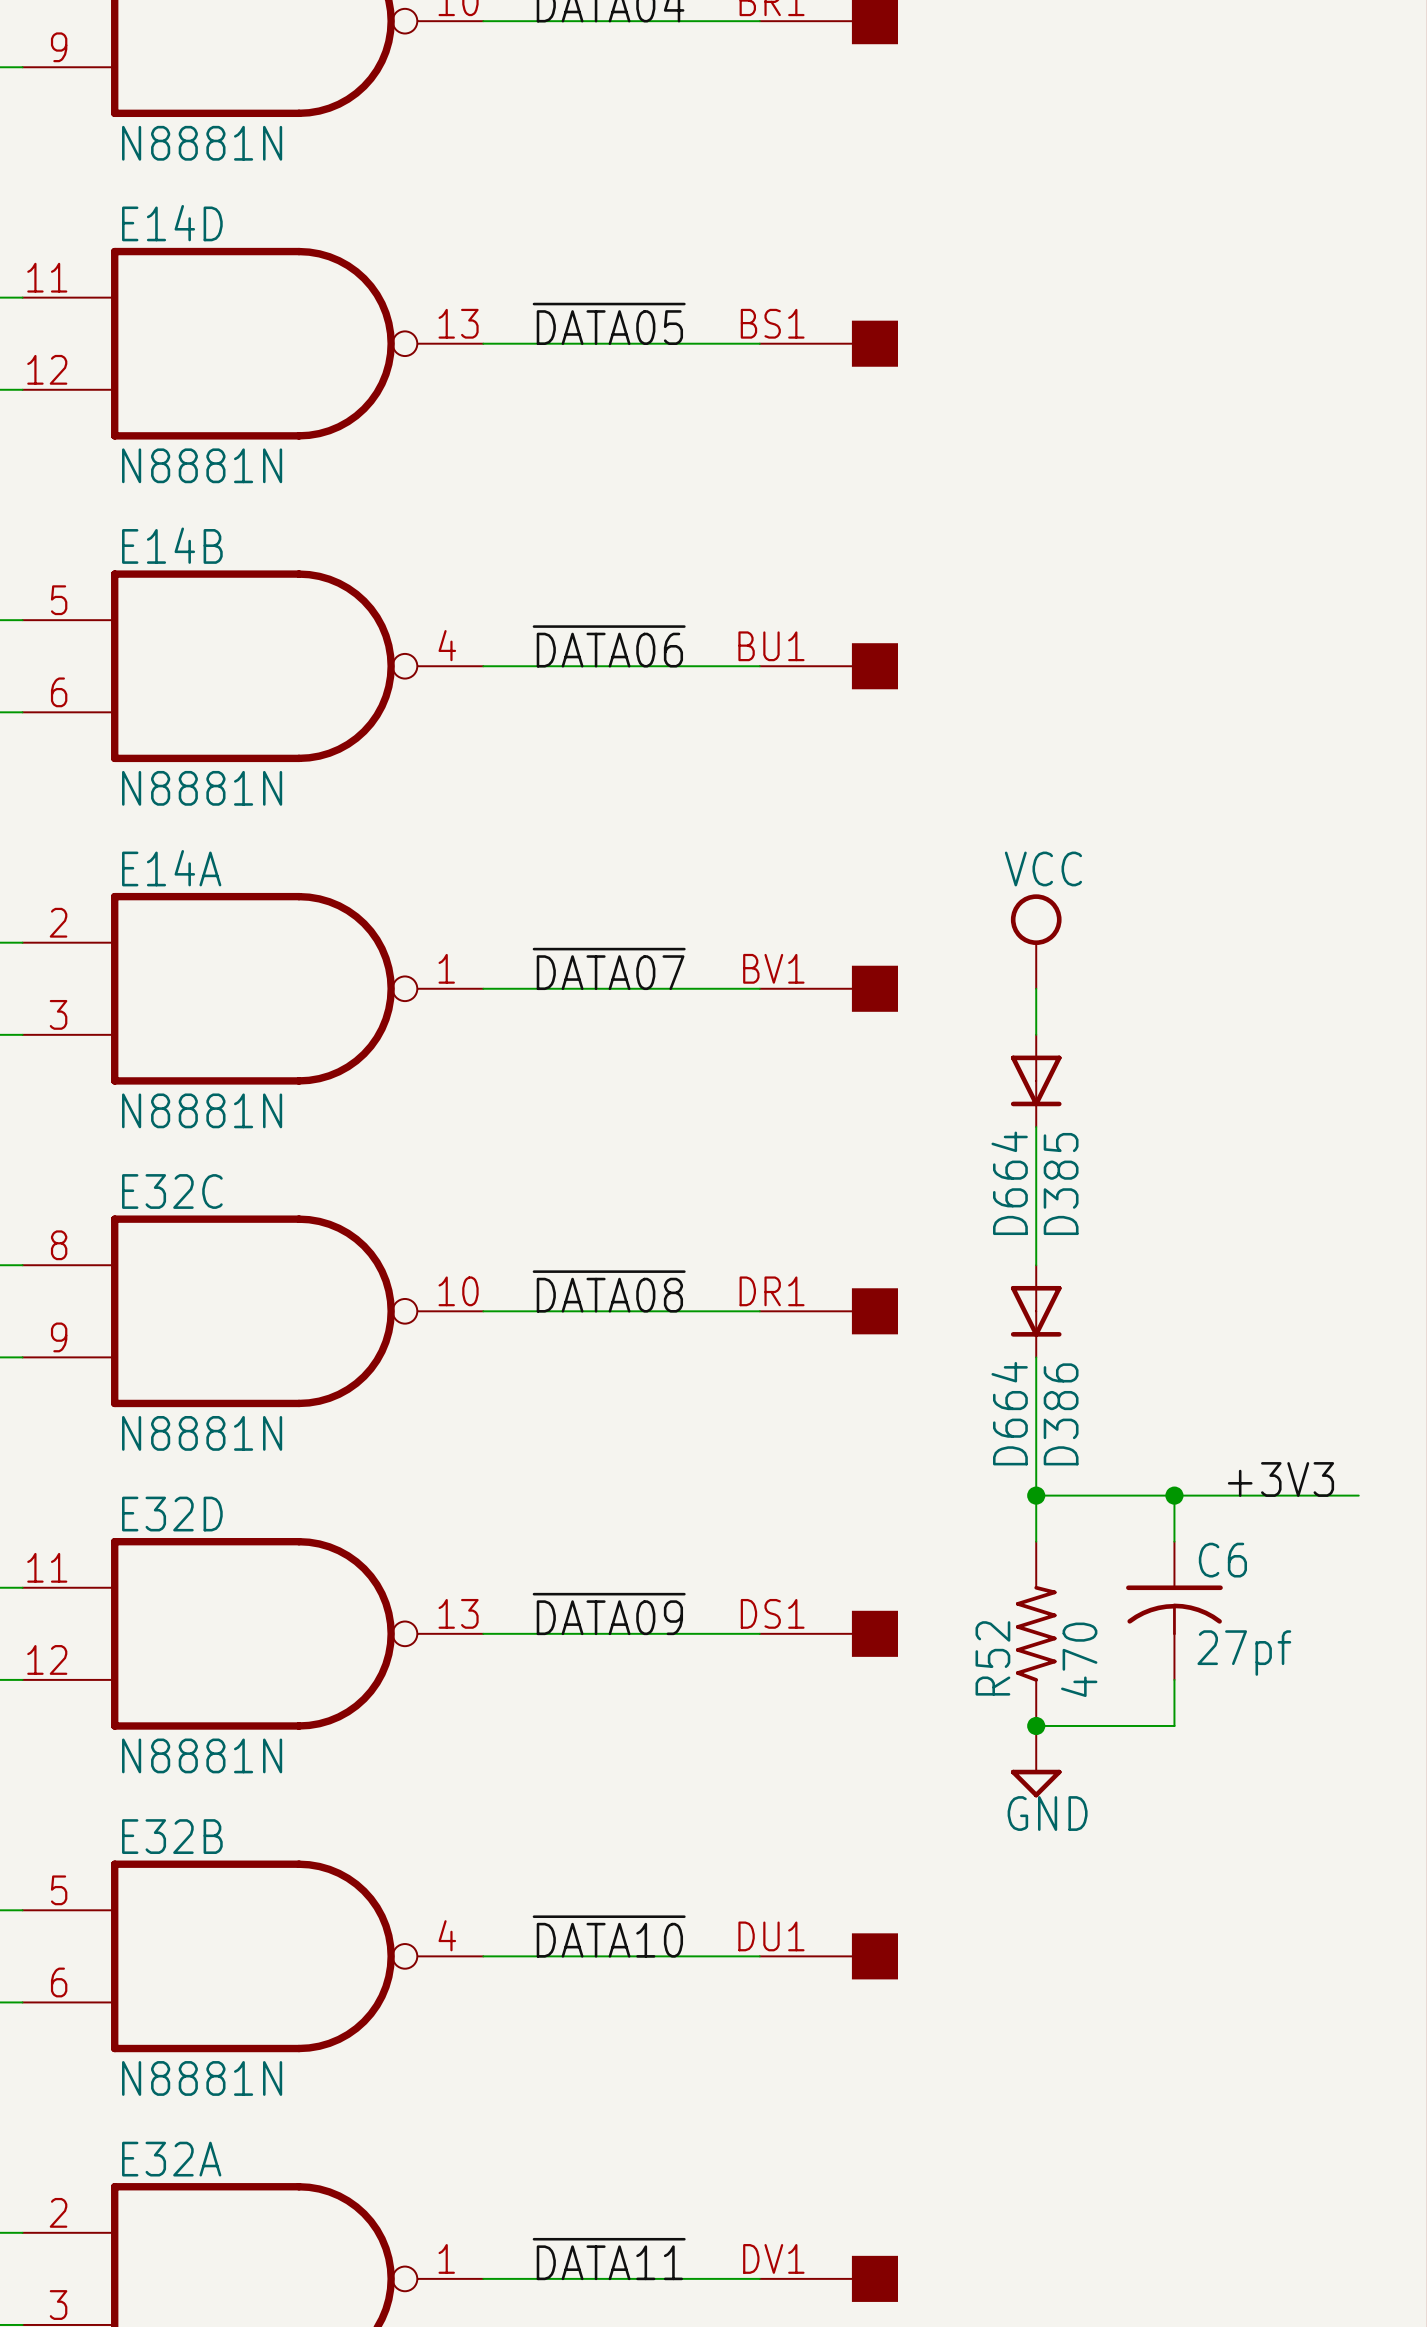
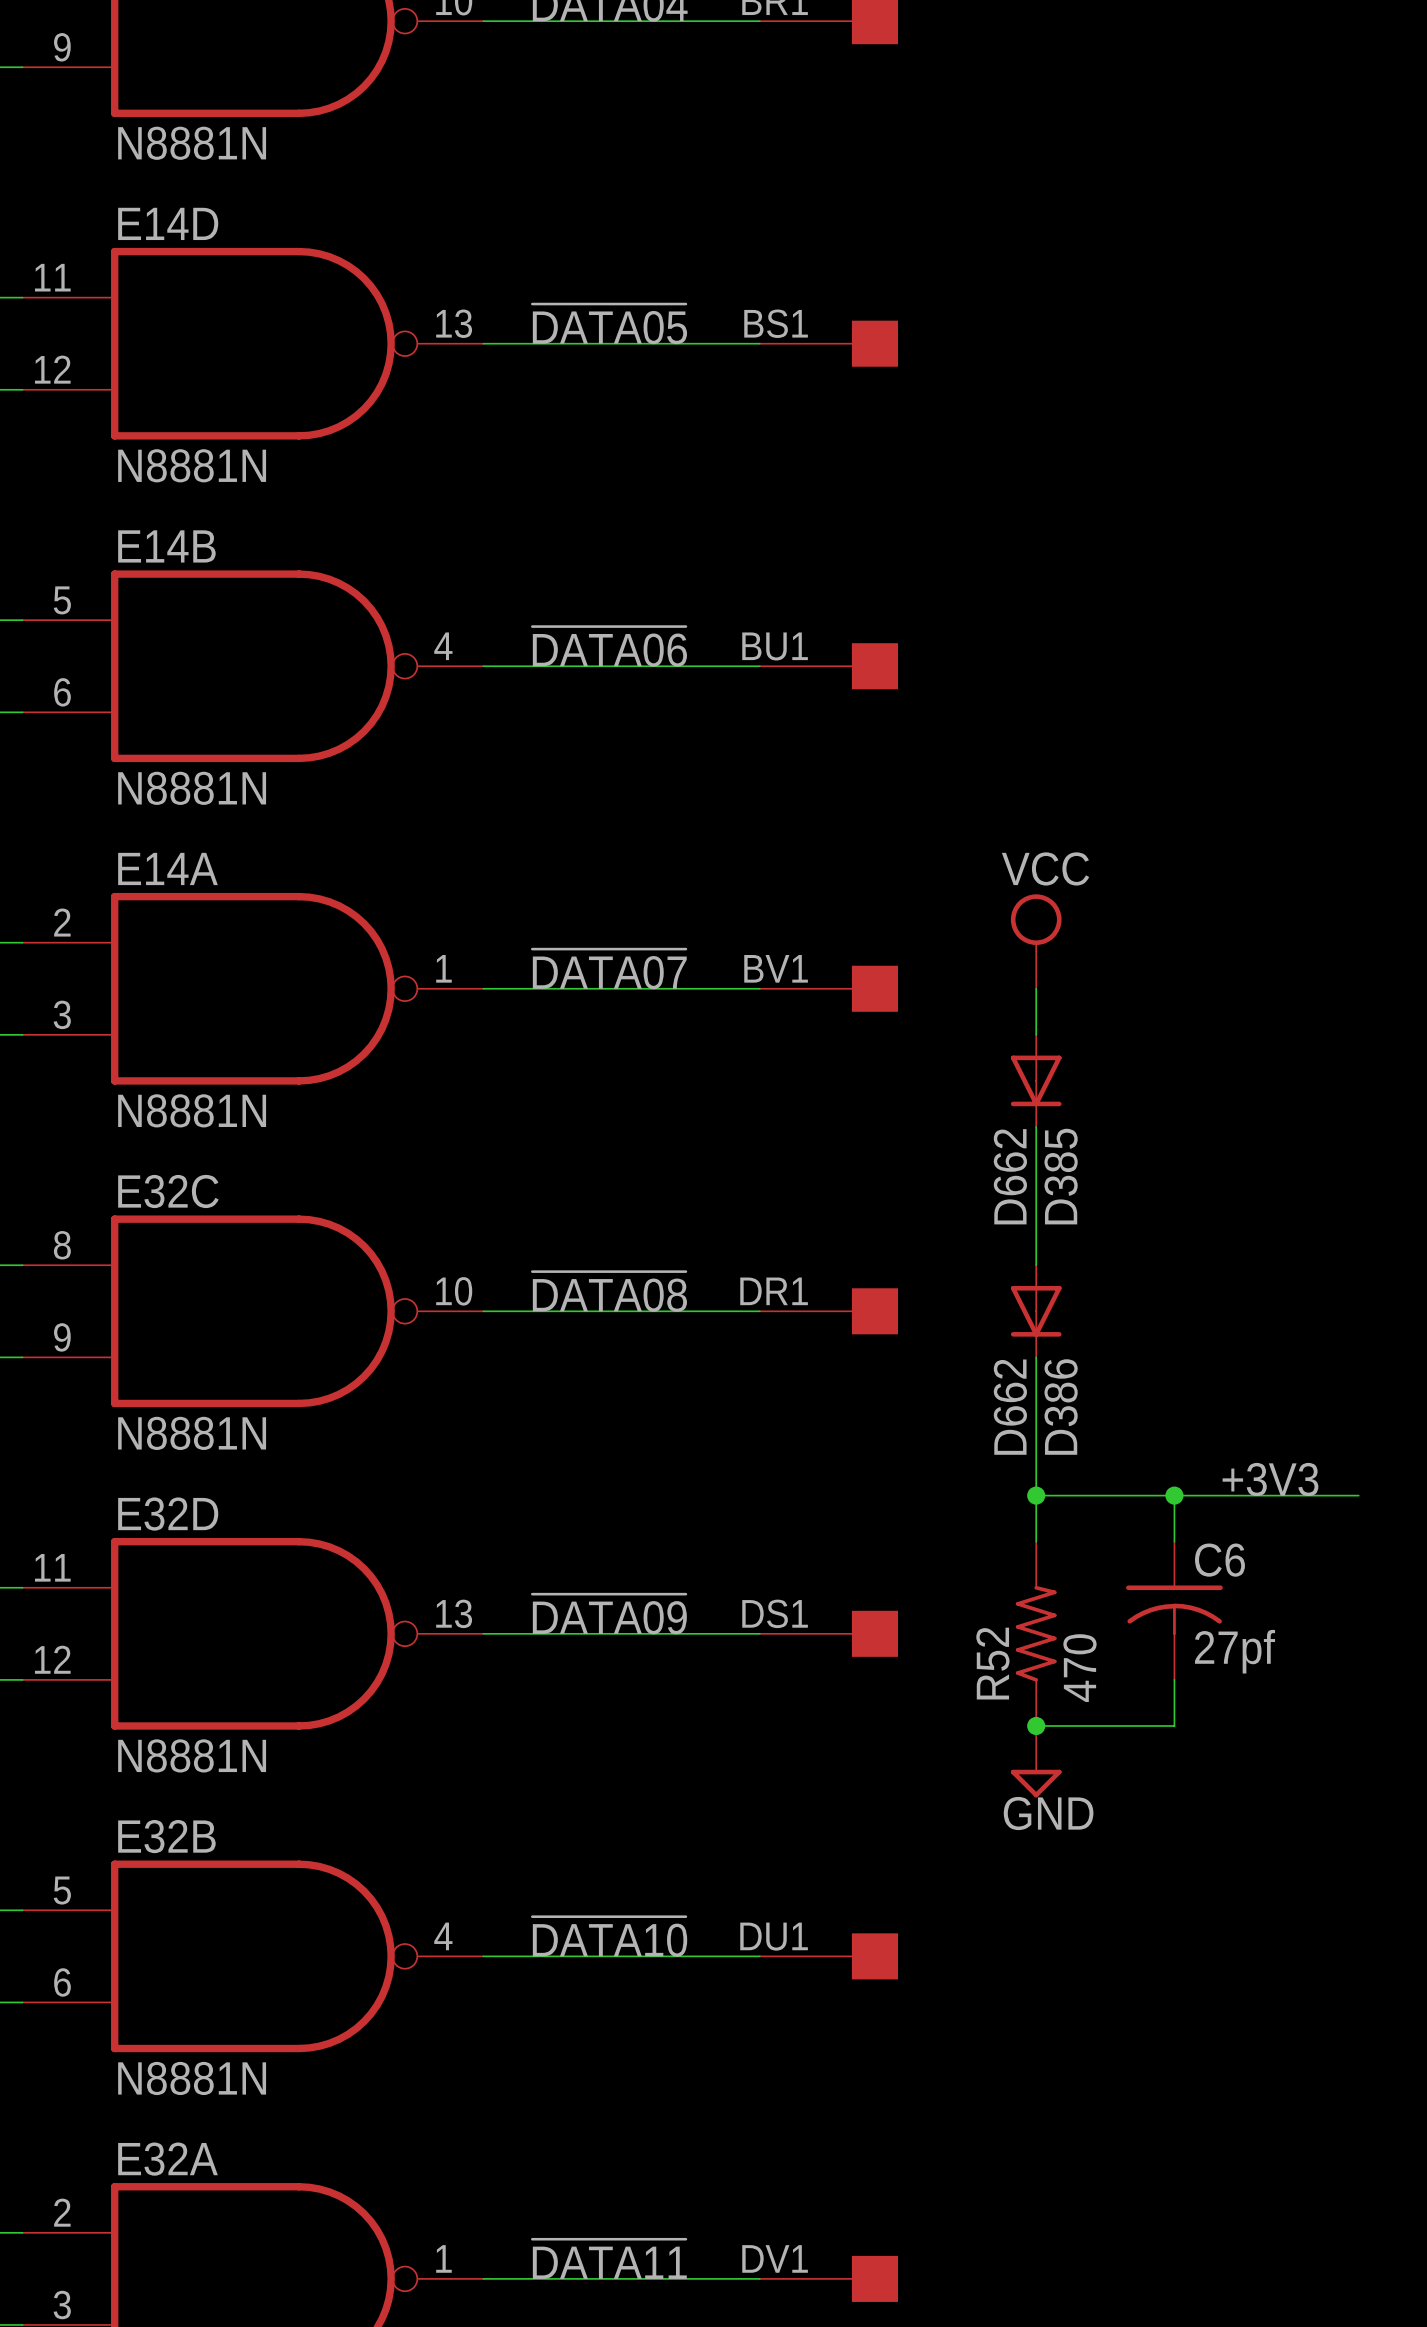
D385 value: D664 (1009, 1183) -> D662 (1010, 1176)
D386 value: D664 (1009, 1413) -> D662 (1010, 1407)

